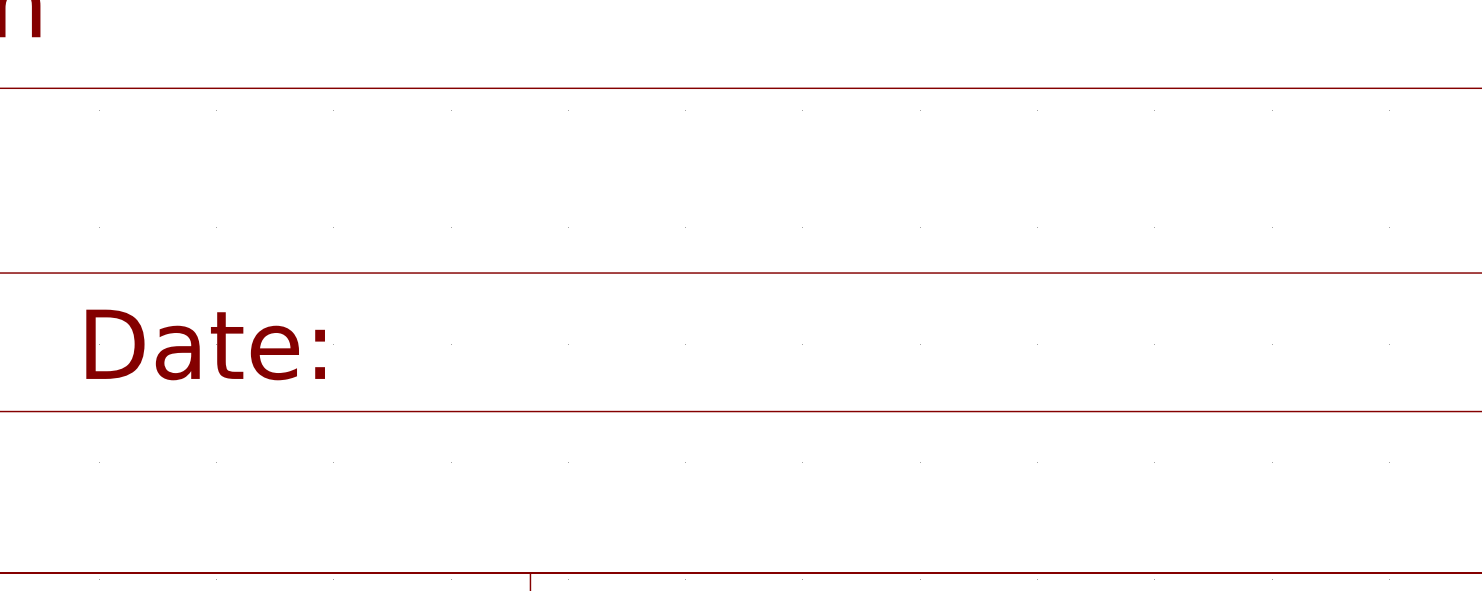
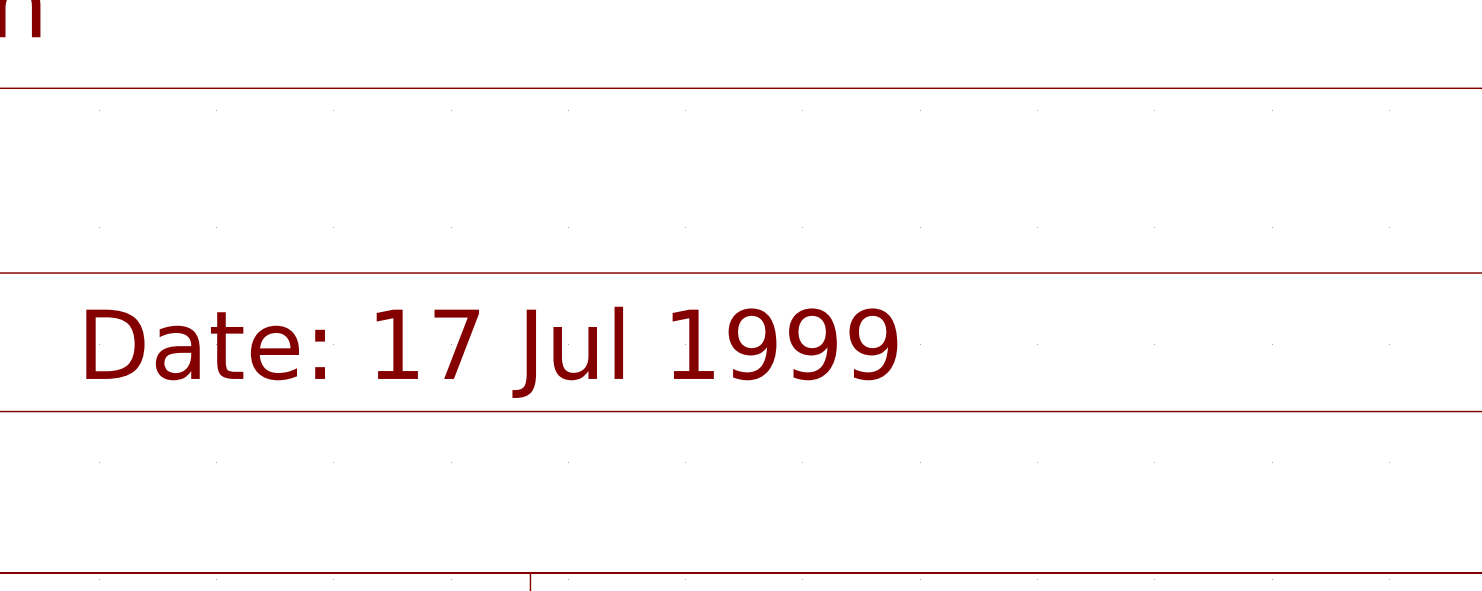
title block: Date: (205, 344) -> Date: 17 Jul 1999 (491, 352)

